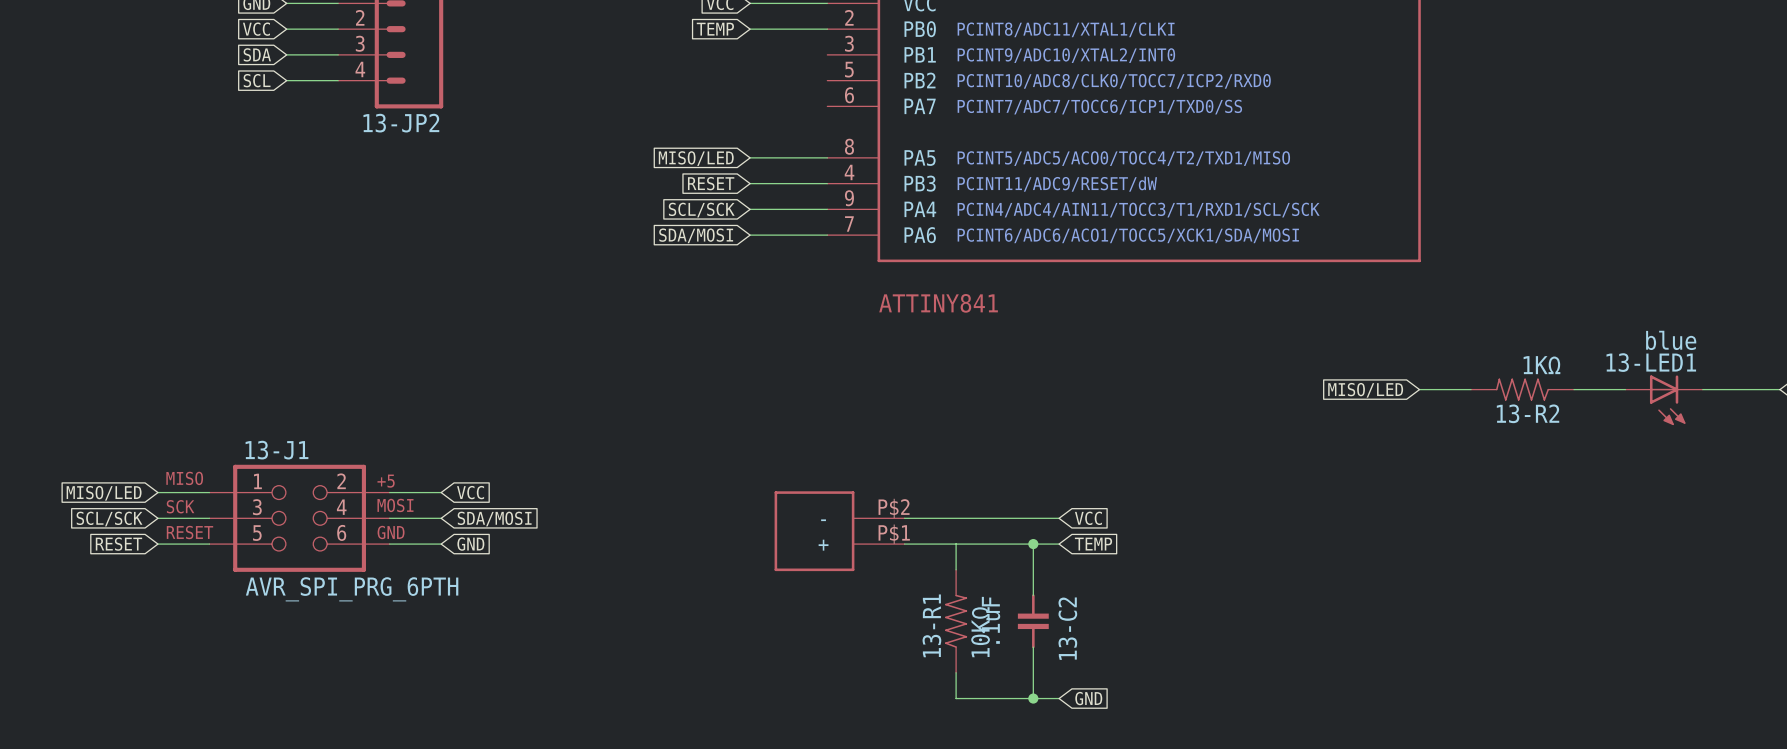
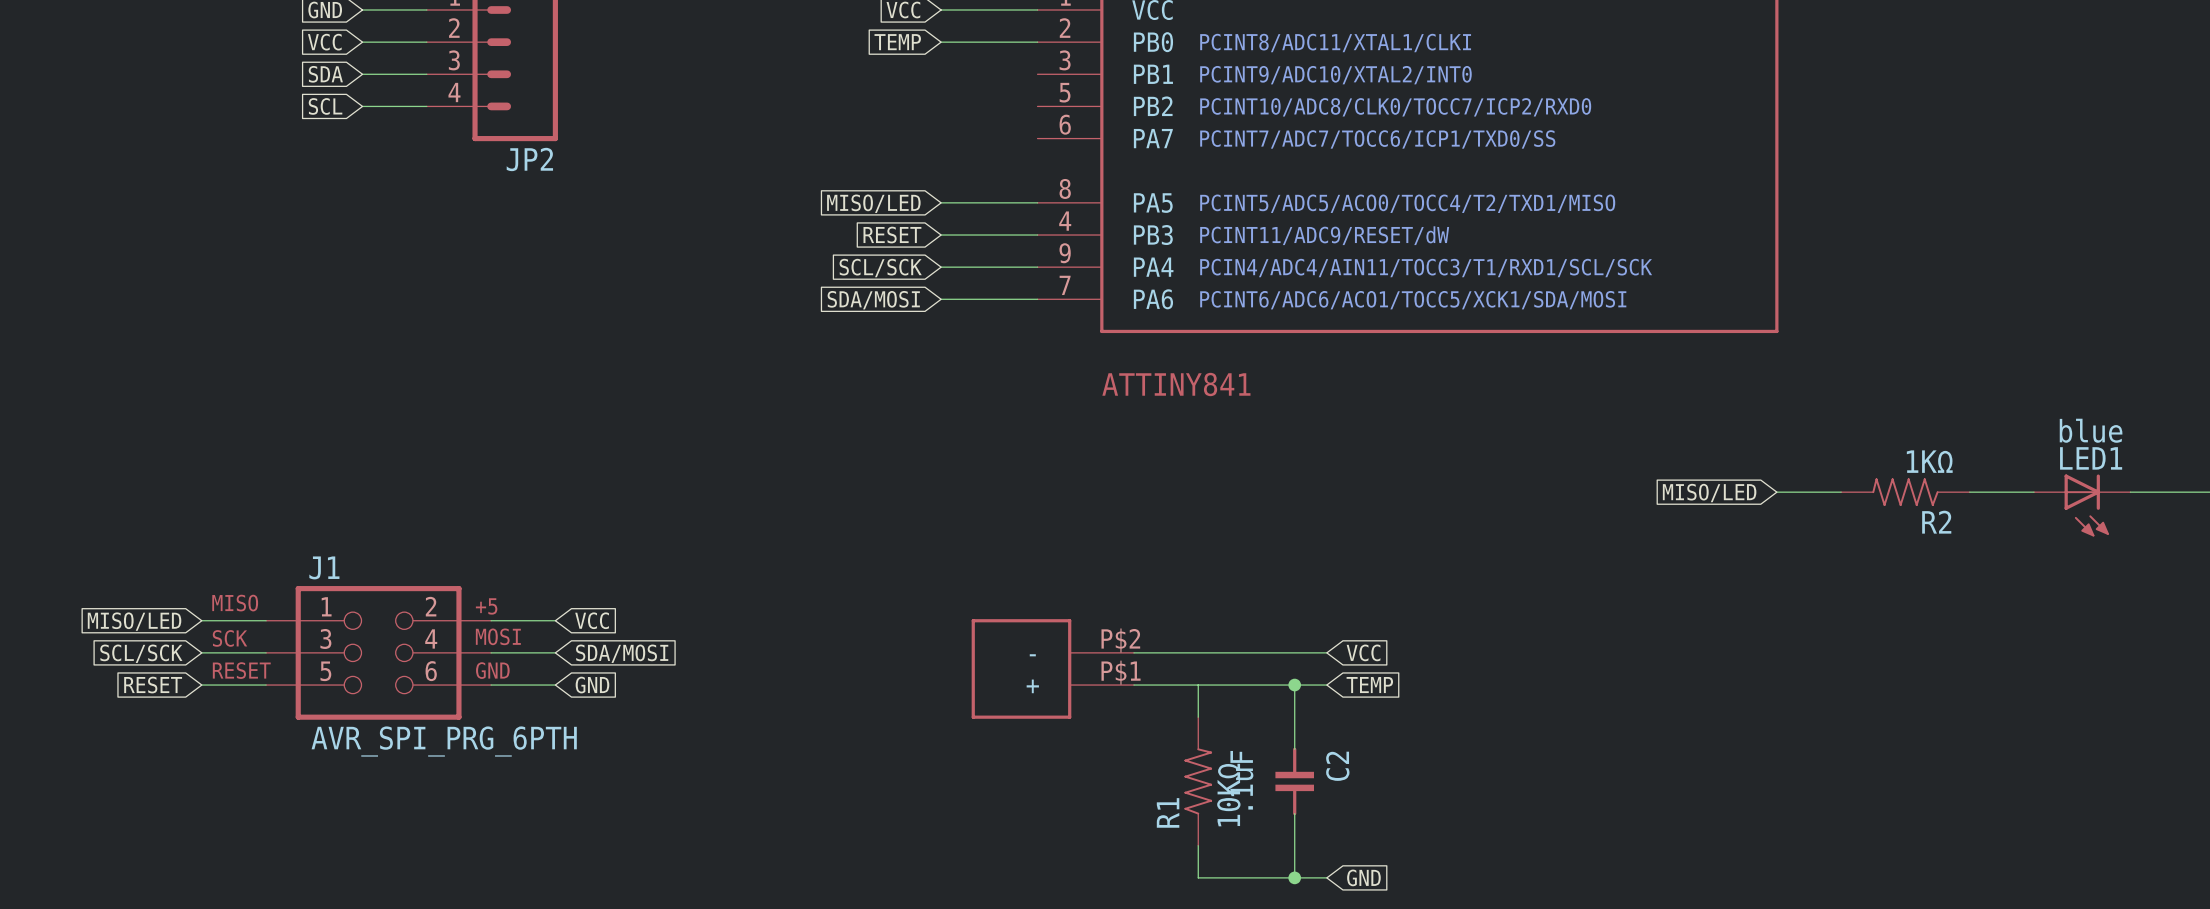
13-JP2 name: 13-JP2 (401, 123) -> JP2 (529, 159)
13-LED1 name: 13-LED1 (1651, 362) -> LED1 (2091, 458)
13-R2 name: 13-R2 (1528, 413) -> R2 (1936, 522)
13-J1 name: 13-J1 (276, 450) -> J1 (324, 567)
13-R1 name: 13-R1 (931, 625) -> R1 (1168, 812)
13-C2 name: 13-C2 (1067, 628) -> C2 (1337, 766)

